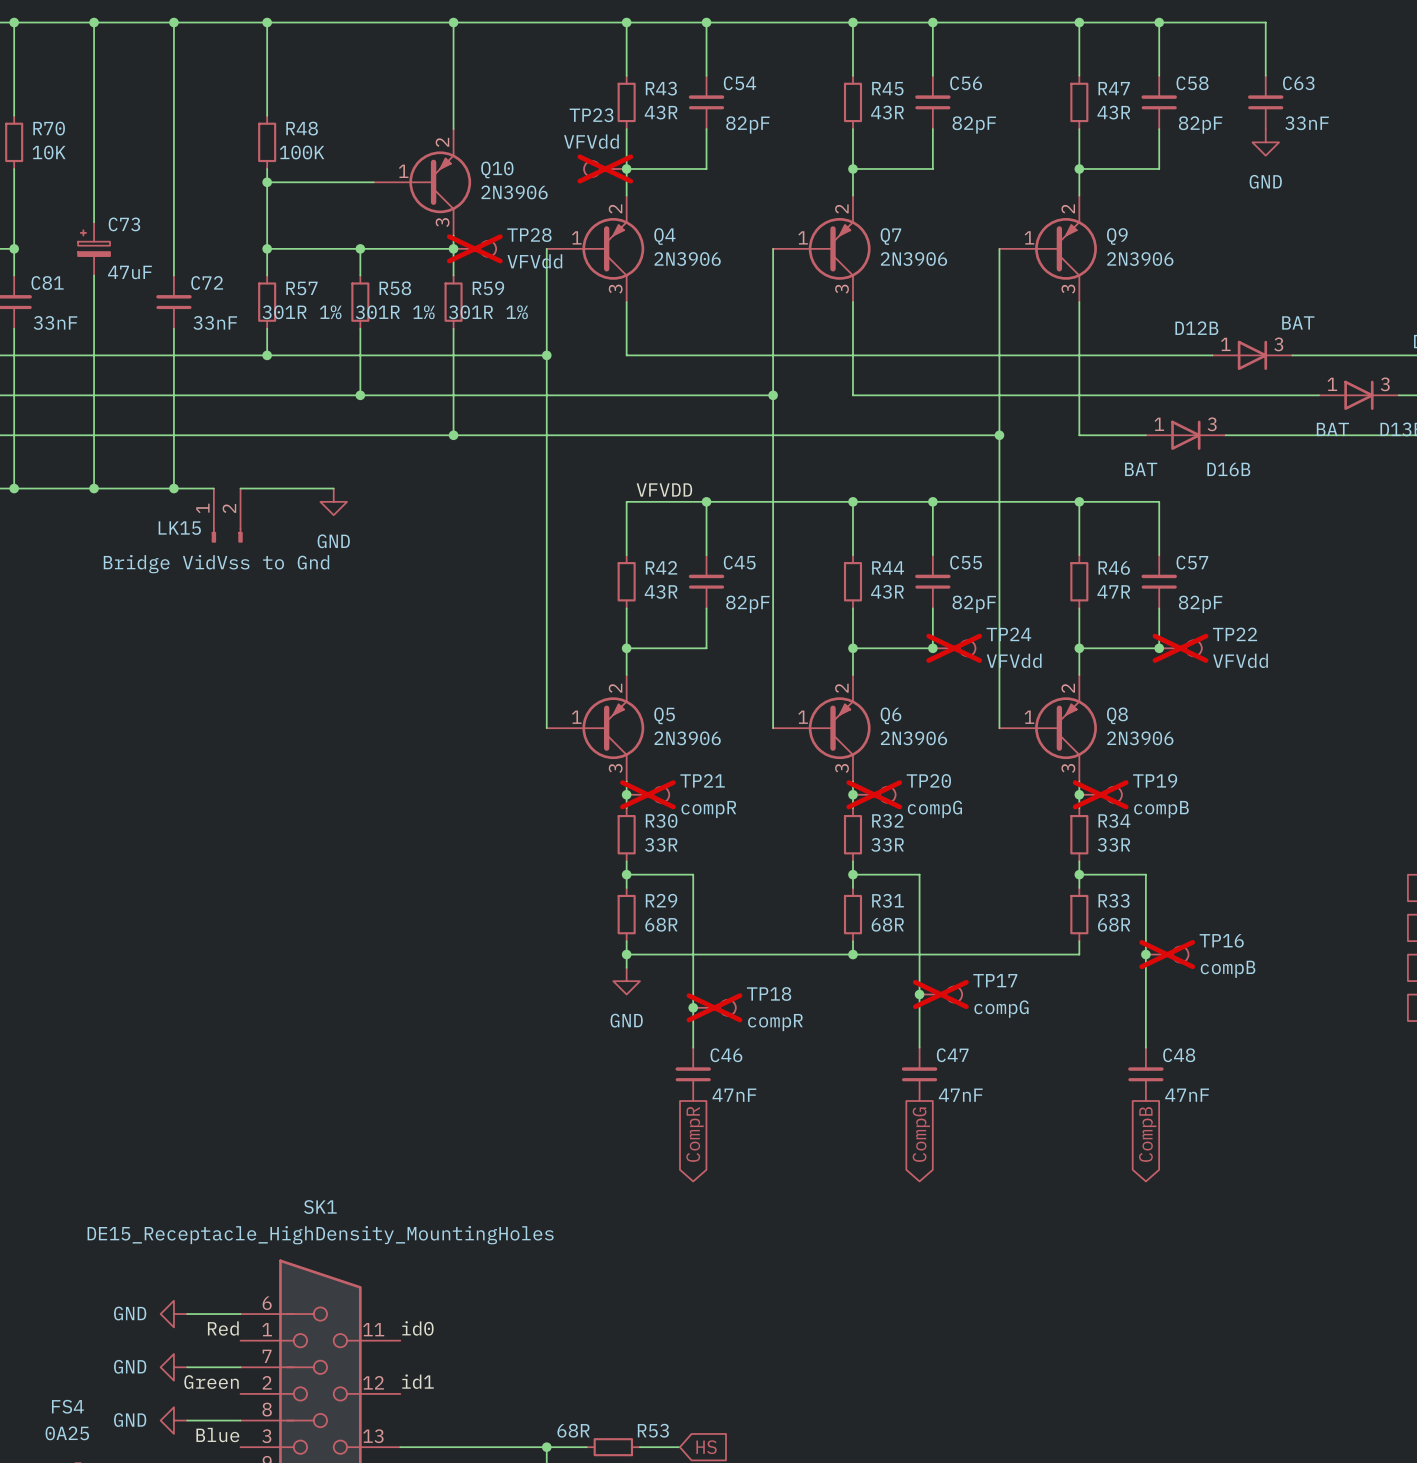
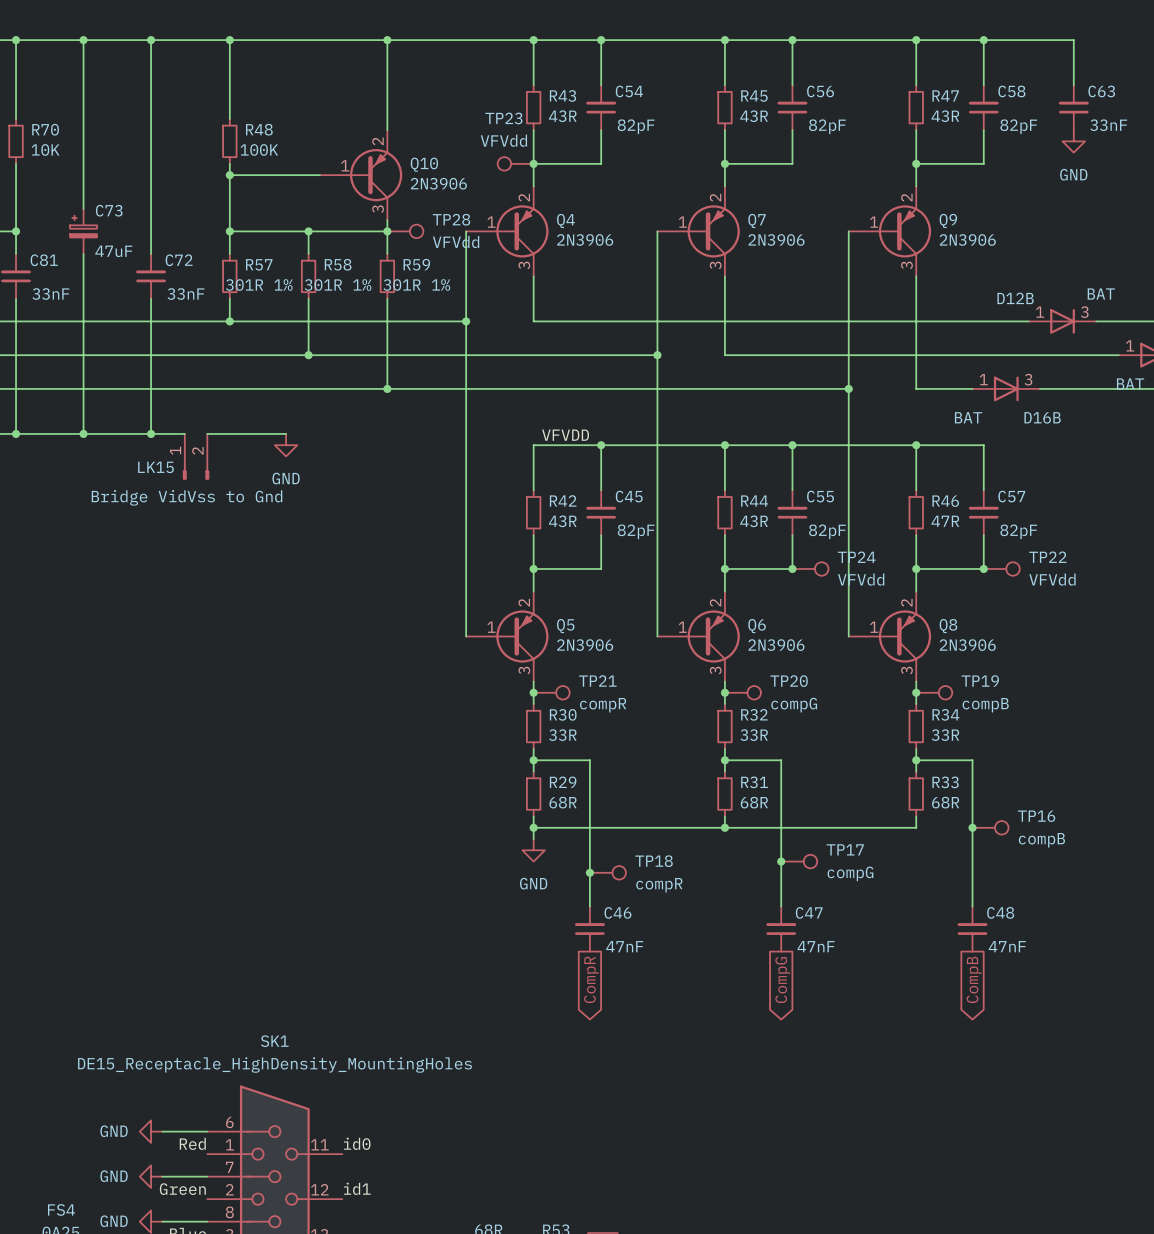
TP23 do-not-place cross: (605, 168) -> none
TP28 do-not-place cross: (474, 248) -> none
TP24 do-not-place cross: (954, 648) -> none
TP22 do-not-place cross: (1180, 648) -> none
TP21 do-not-place cross: (647, 794) -> none
TP20 do-not-place cross: (874, 794) -> none
TP19 do-not-place cross: (1100, 794) -> none
TP16 do-not-place cross: (1167, 954) -> none
TP17 do-not-place cross: (940, 994) -> none
TP18 do-not-place cross: (714, 1007) -> none

